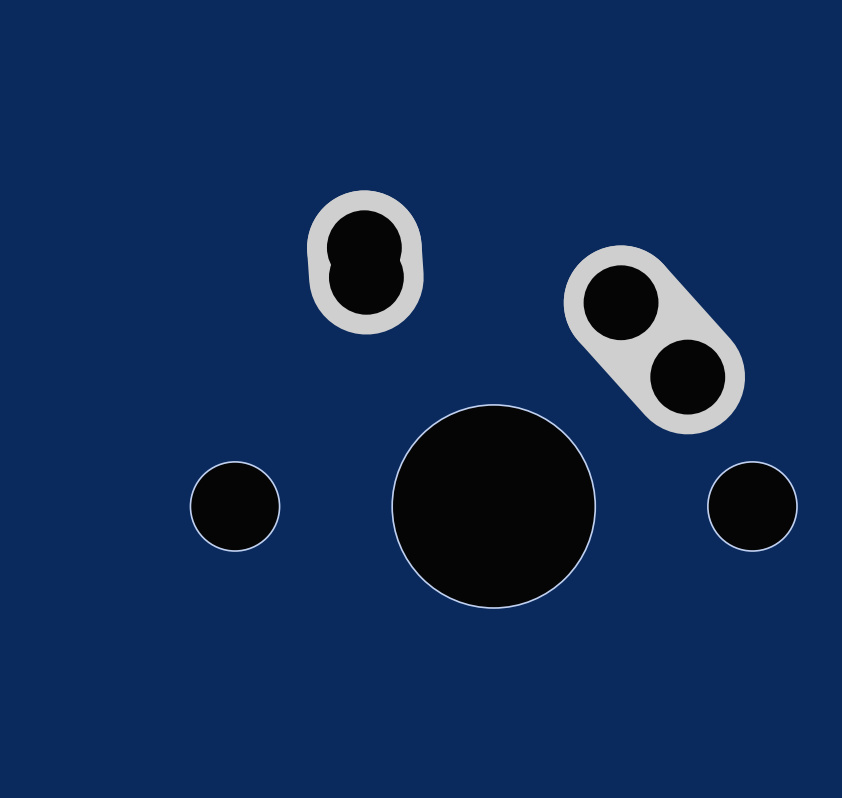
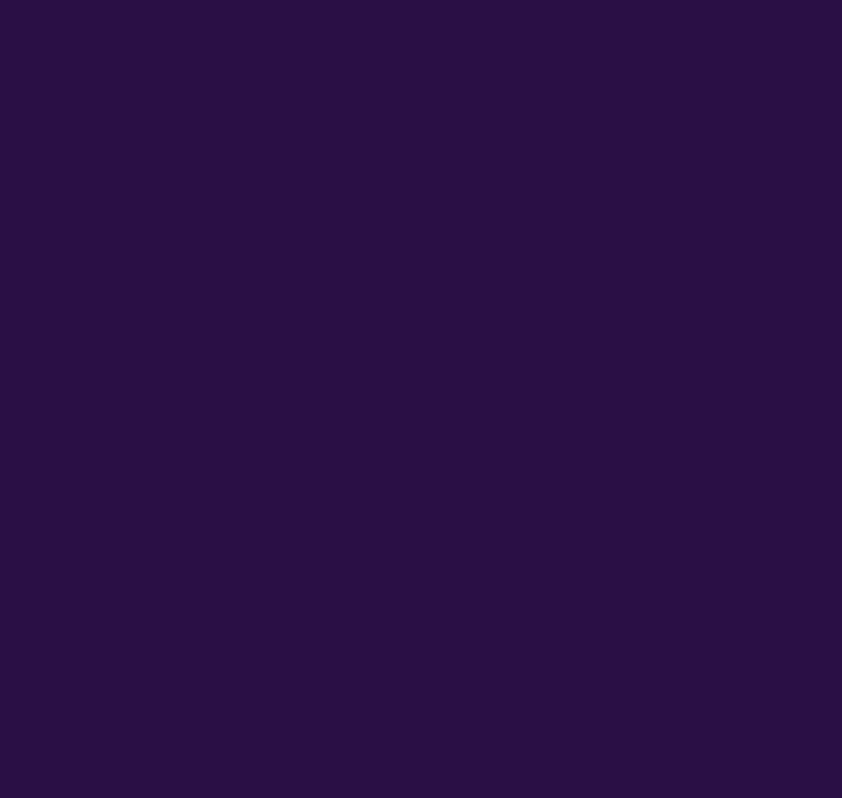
part: (493, 399) -> none

